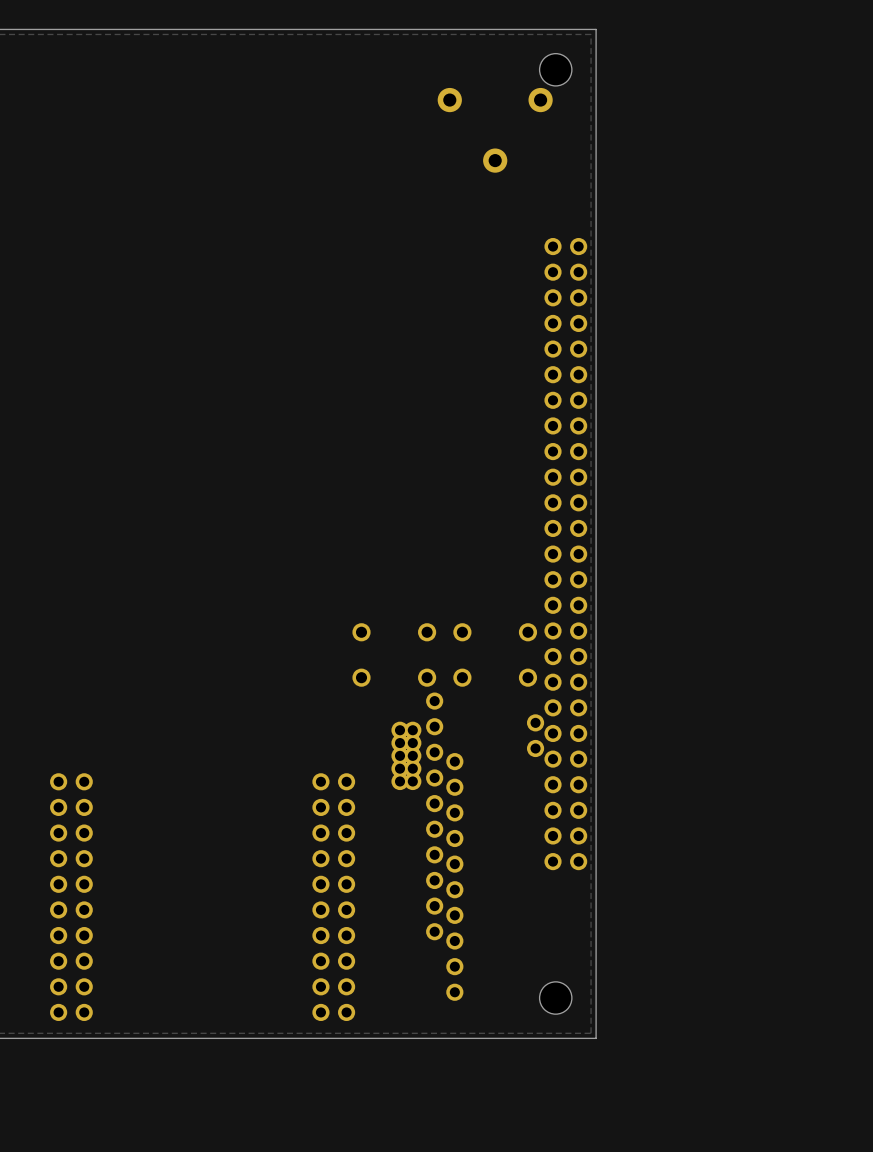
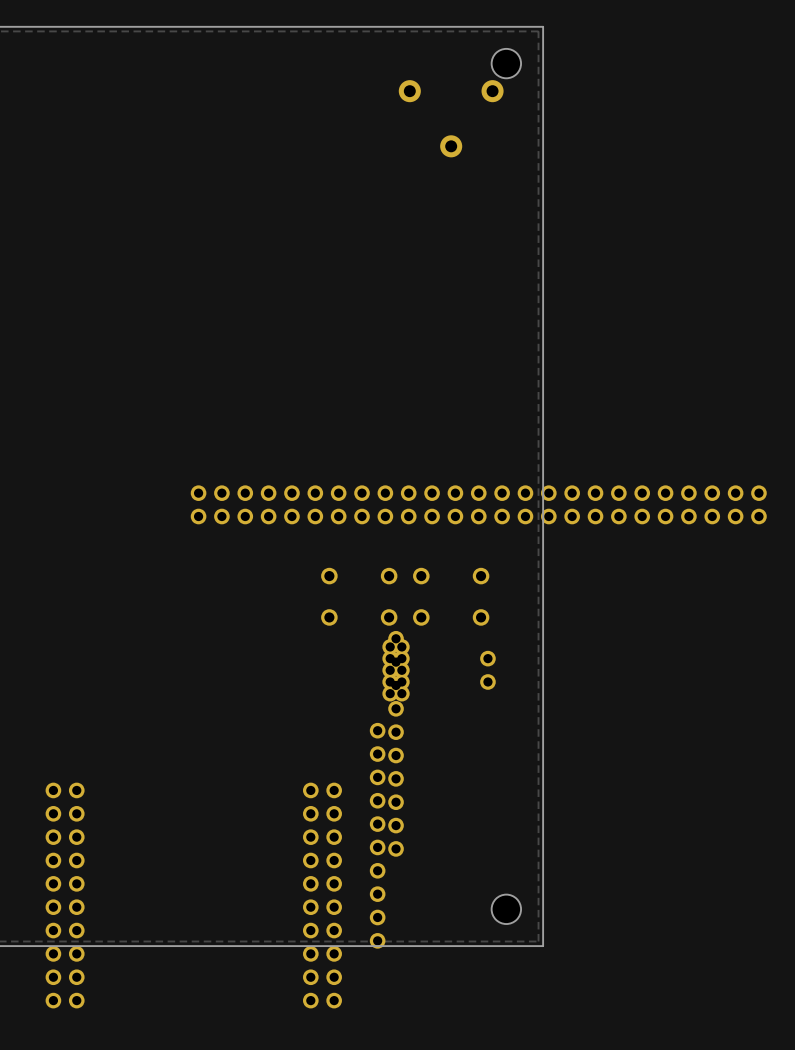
part rotation: 0° (565, 554) -> 90° clockwise (478, 504)
part position: (406, 755) -> (396, 670)
part position: (454, 876) -> (377, 835)
part position: (71, 897) -> (65, 895)
part position: (333, 897) -> (322, 895)

